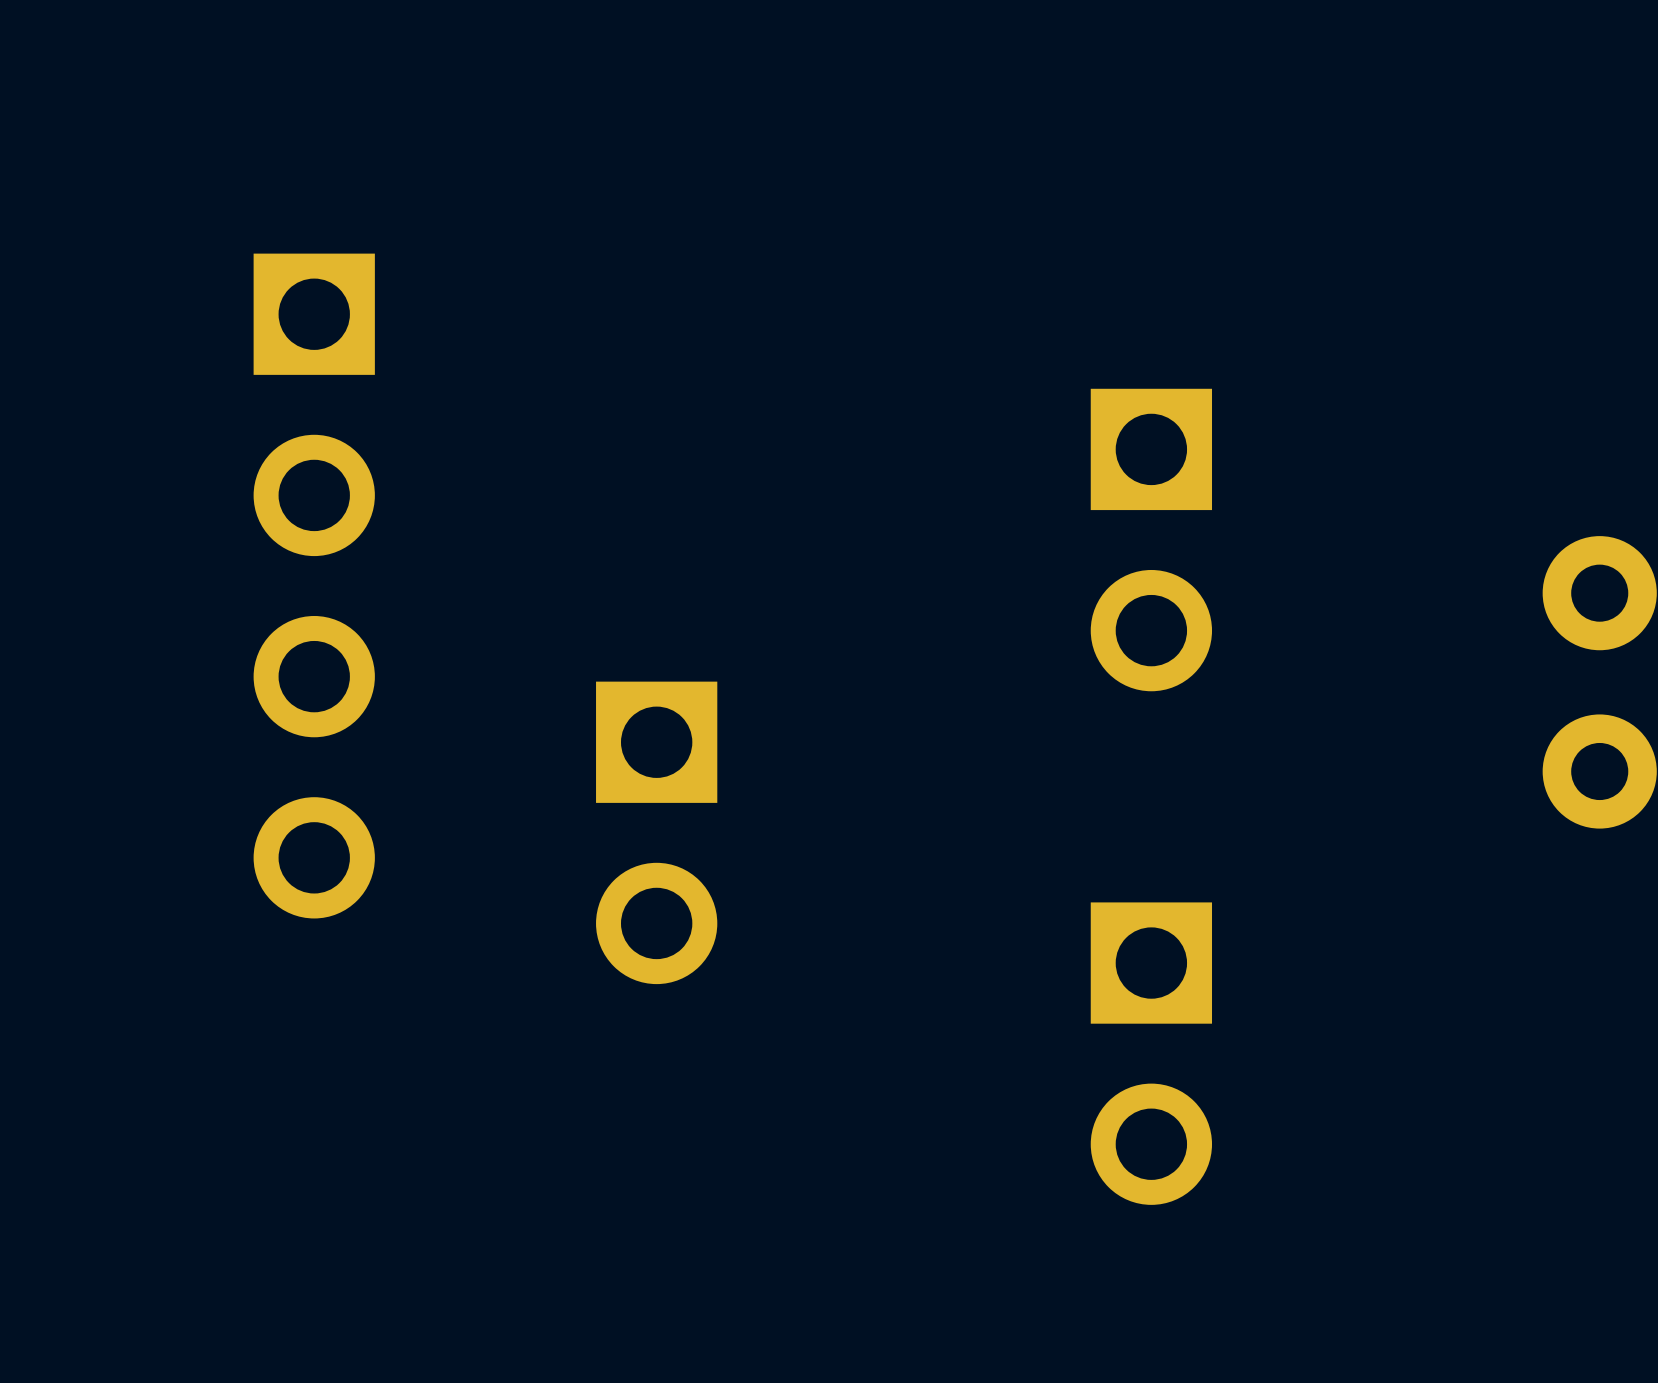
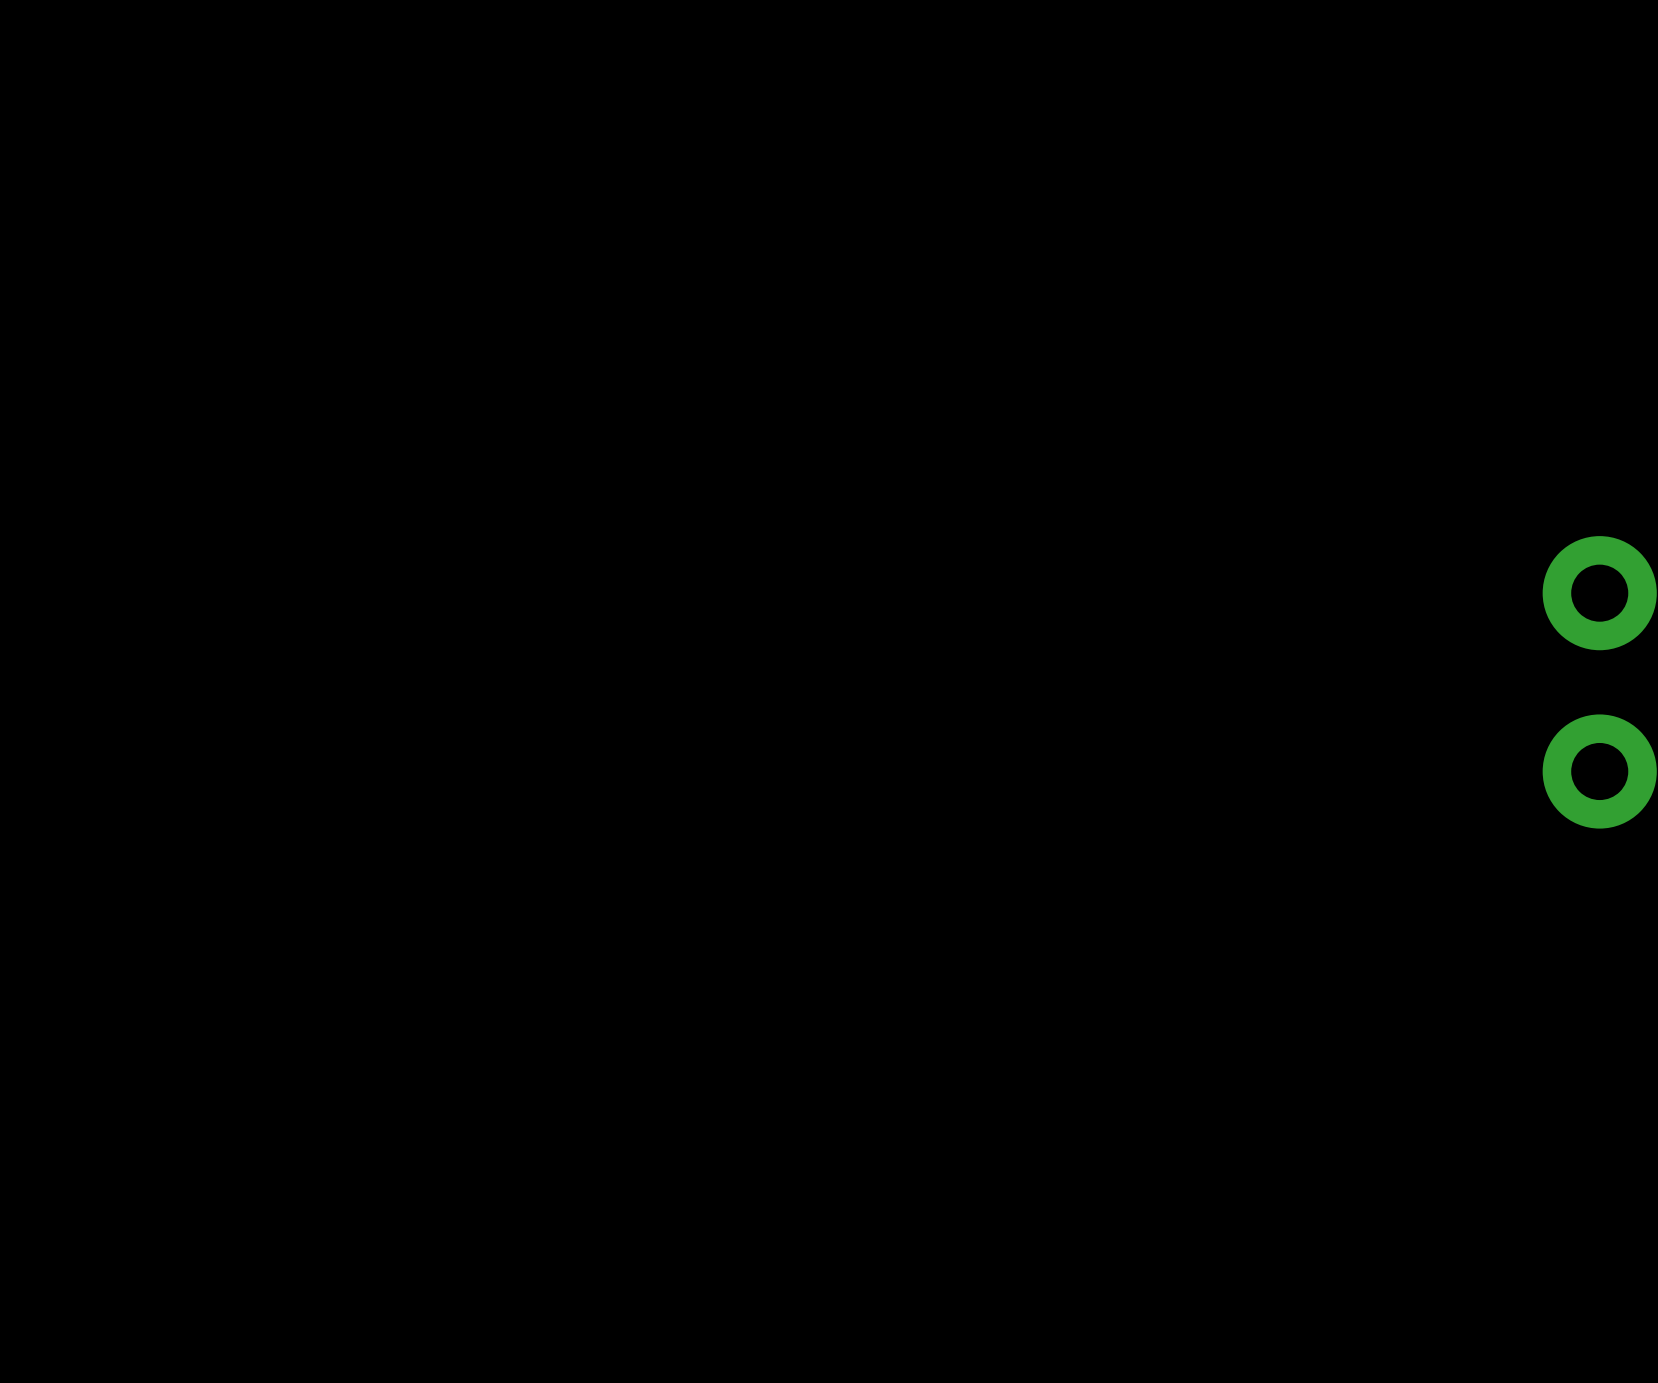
part: (1151, 540) -> none
part: (314, 586) -> none
part: (656, 832) -> none
part: (1151, 1053) -> none

